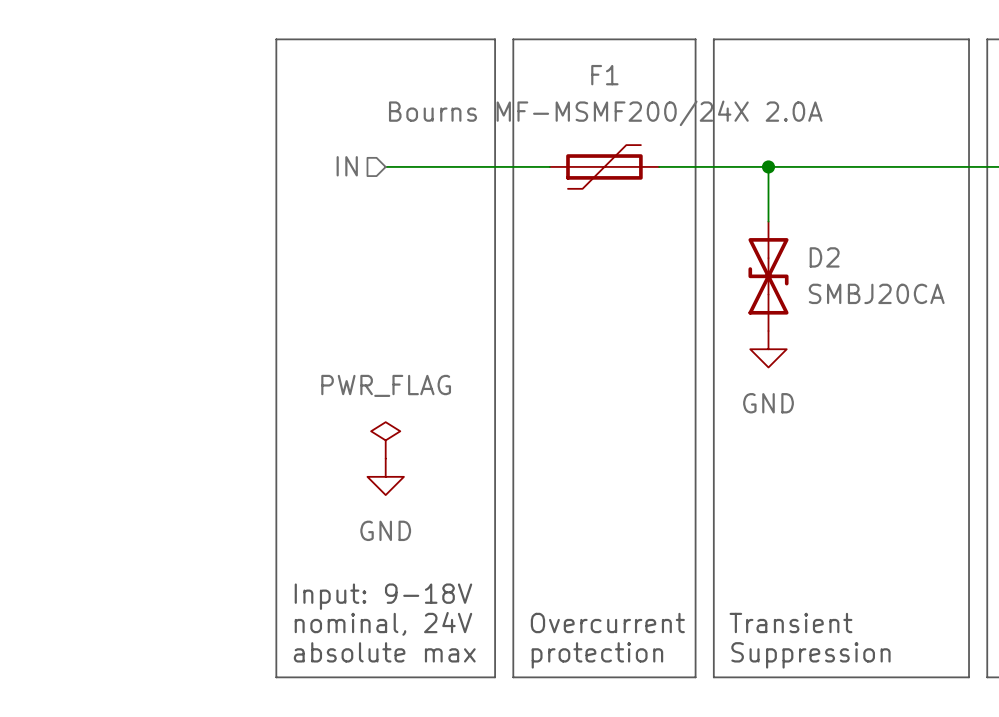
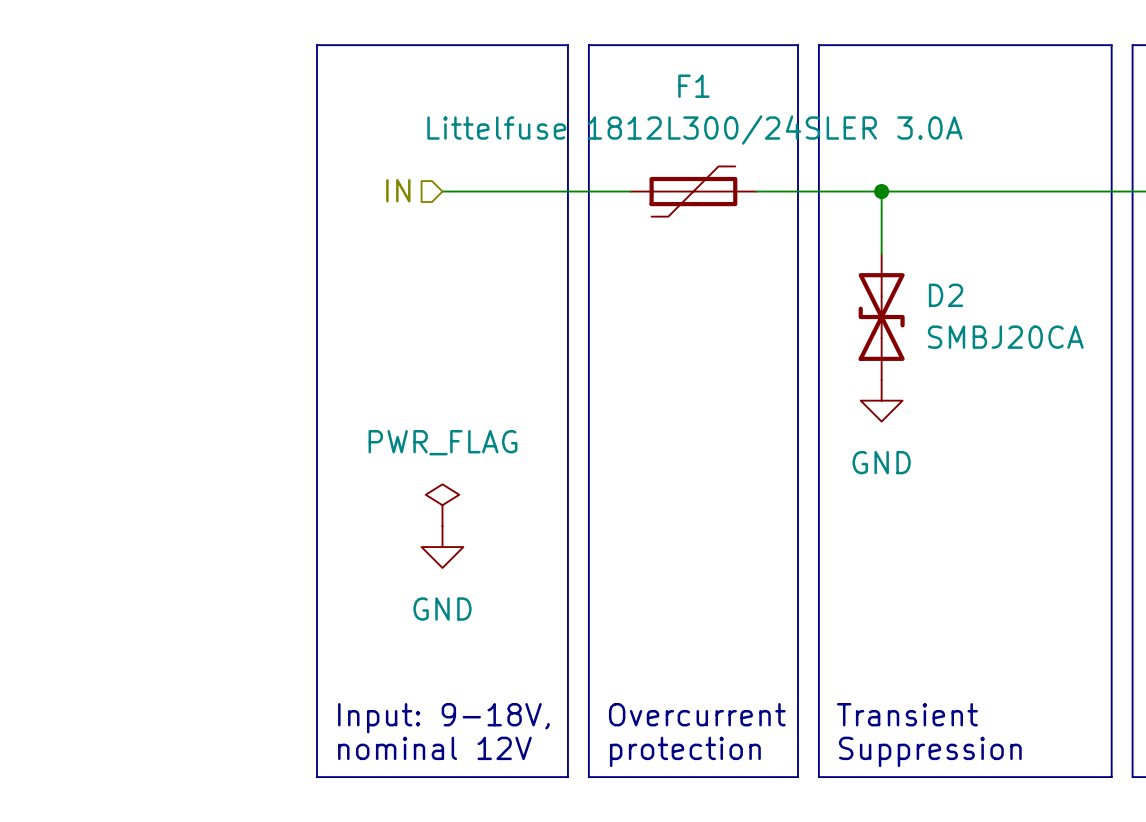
F1 value: Bourns MF-MSMF200/24X 2.0A (605, 113) -> Littelfuse 1812L300/24SLER 3.0A (694, 130)
text: Input: 9-18V (383, 596) -> none
text: nominal, 24V (383, 623) -> Input: 9-18V, (443, 718)
text: absolute max (384, 652) -> nominal 12V (434, 748)

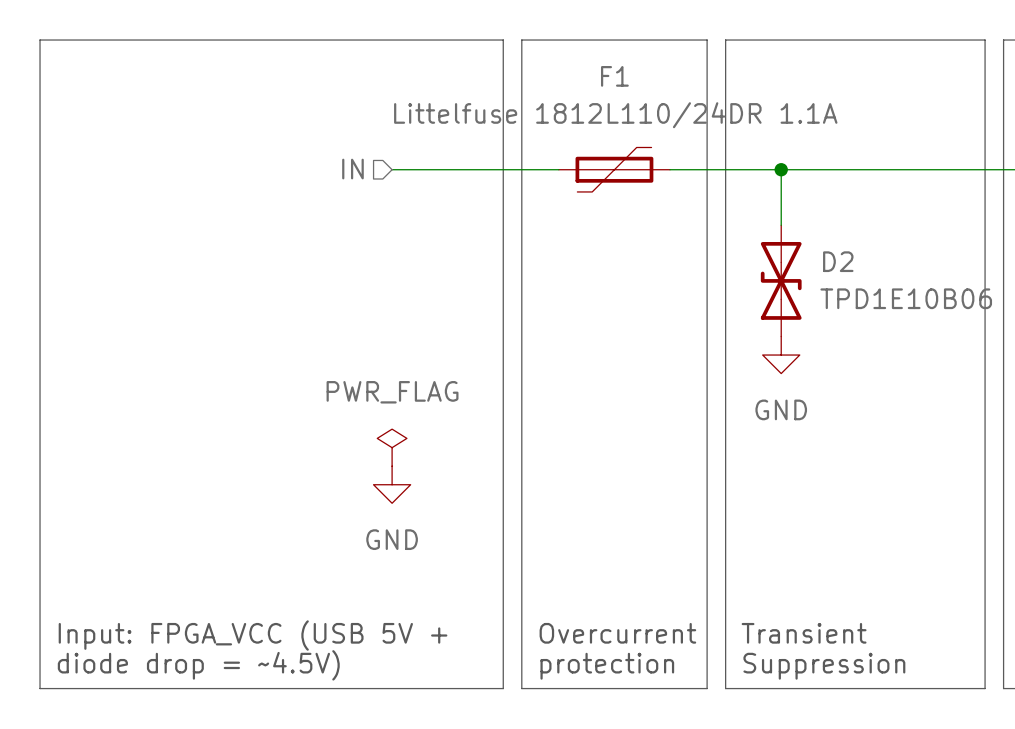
line: (317, 45) (317, 777) -> (280, 40) (40, 40) (40, 688) (280, 688)
F1 value: Littelfuse 1812L300/24SLER 3.0A (694, 130) -> Littelfuse 1812L110/24DR 1.1A (615, 115)
D2 value: SMBJ20CA (1005, 337) -> TPD1E10B06 (906, 298)
text: none -> Input: FPGA_VCC (USB 5V + (253, 635)
text: Input: 9-18V, (443, 718) -> none
text: nominal 12V (434, 748) -> none
text: none -> diode drop = ~4.5V) (198, 665)

